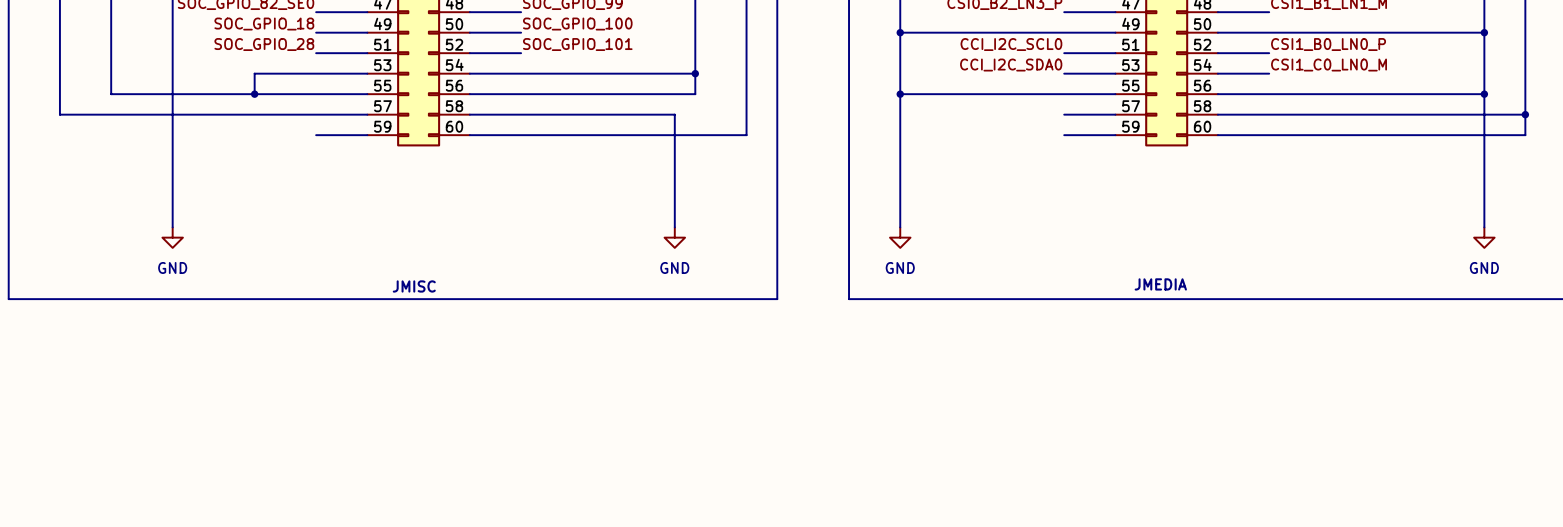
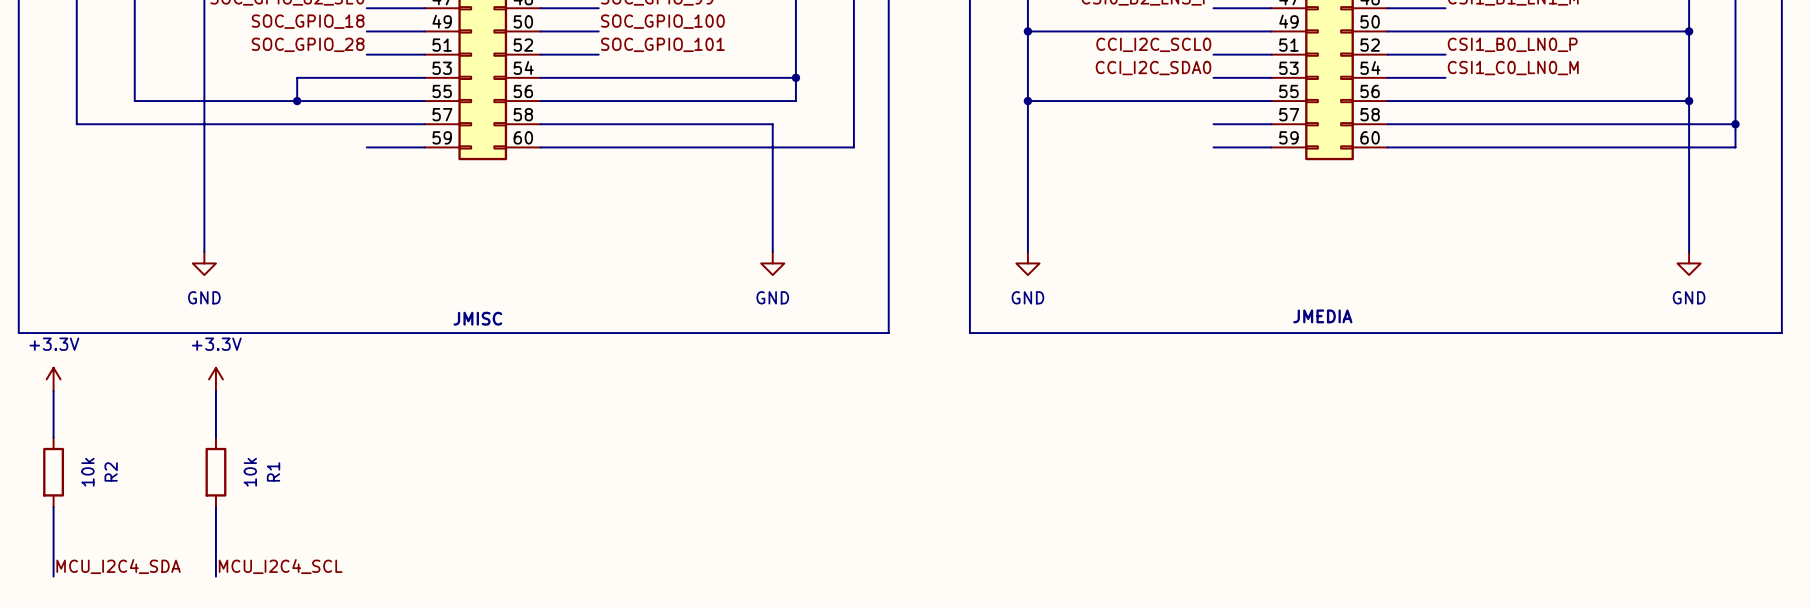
power symbol: none -> +3.3V (53, 379)
power symbol: none -> +3.3V (215, 379)
wire: none -> (53, 391) (53, 437)
wire: none -> (215, 391) (215, 437)
R2: none -> 10k (53, 472)
R1: none -> 10k (215, 472)
wire: none -> (53, 507) (53, 576)
wire: none -> (215, 507) (215, 576)
label: none -> MCU_I2C4_SDA (118, 566)
label: none -> MCU_I2C4_SCL (280, 566)

